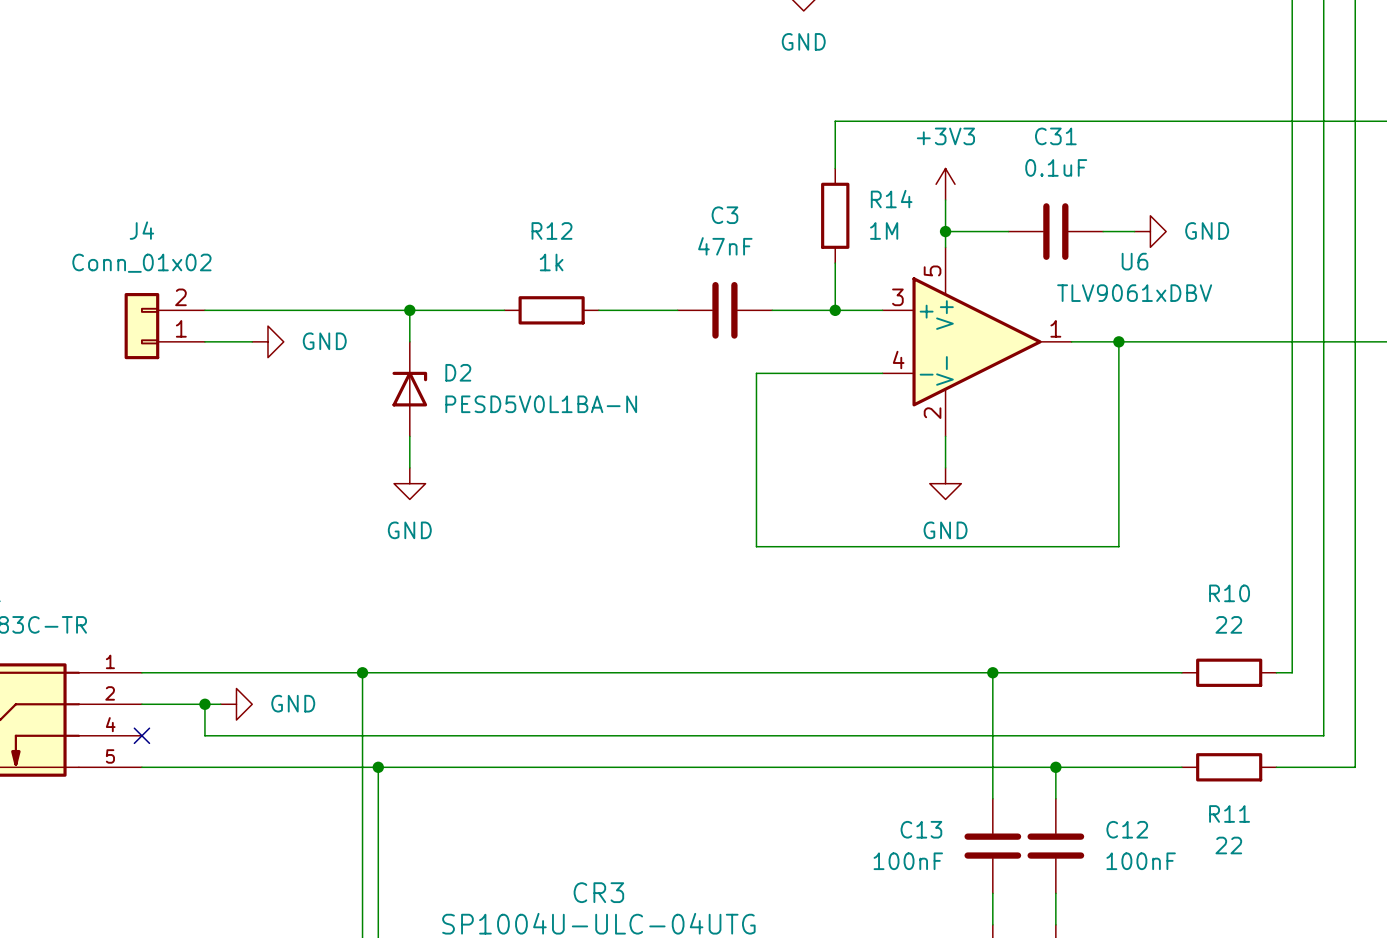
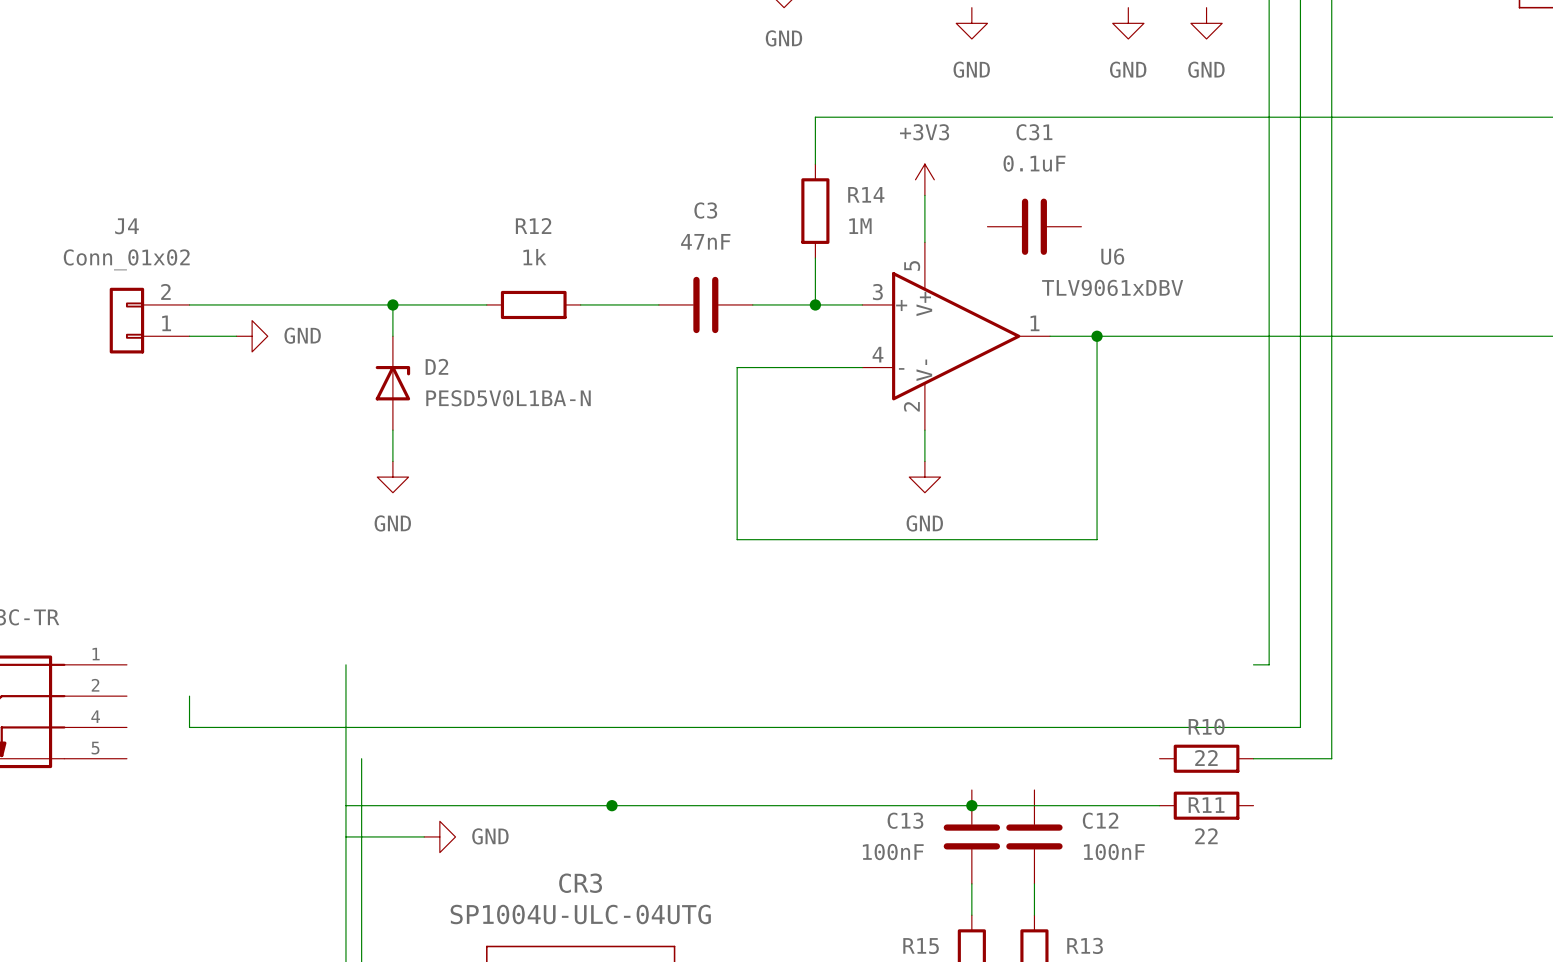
power symbol: none -> GND (971, 23)
power symbol: none -> GND (1128, 23)
power symbol: none -> GND (1206, 23)
wire: (945, 231) (1008, 231) -> none
junction: (945, 231) -> none
wire: (1103, 231) (1134, 231) -> none
power symbol: GND (1150, 231) -> none
wire: (141, 672) (1181, 672) -> none
junction: (362, 672) -> none
wire: (992, 672) (992, 798) -> none
junction: (992, 672) -> none
R10 position: (1229, 672) -> (1206, 805)
wire: (141, 704) (220, 704) -> (345, 836) (424, 836)
junction: (204, 704) -> none
power symbol: GND (236, 704) -> none
no-connect mark: (141, 735) -> none
wire: (141, 767) (1181, 767) -> none
junction: (378, 767) -> none
wire: (1055, 767) (1055, 798) -> none
junction: (1055, 767) -> none
wire: none -> (345, 805) (1159, 805)
junction: none -> (611, 805)
junction: none -> (971, 805)
power symbol: none -> GND (439, 836)

